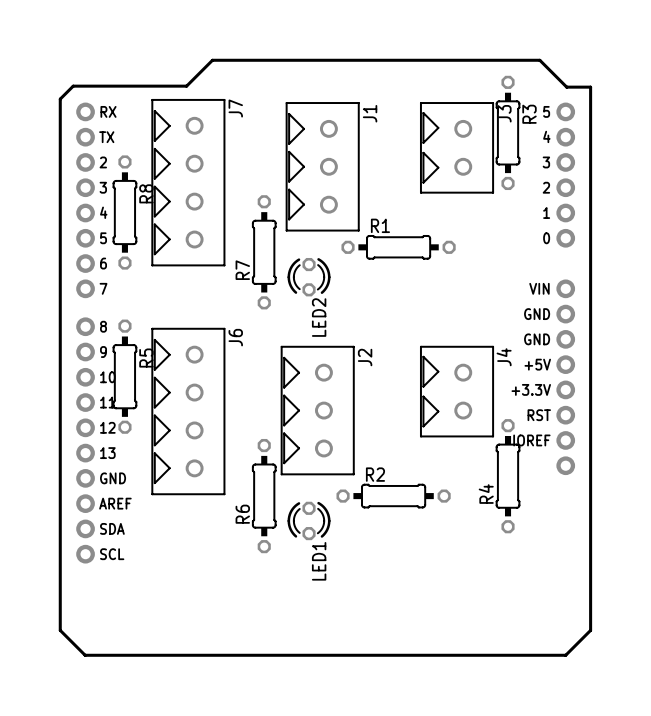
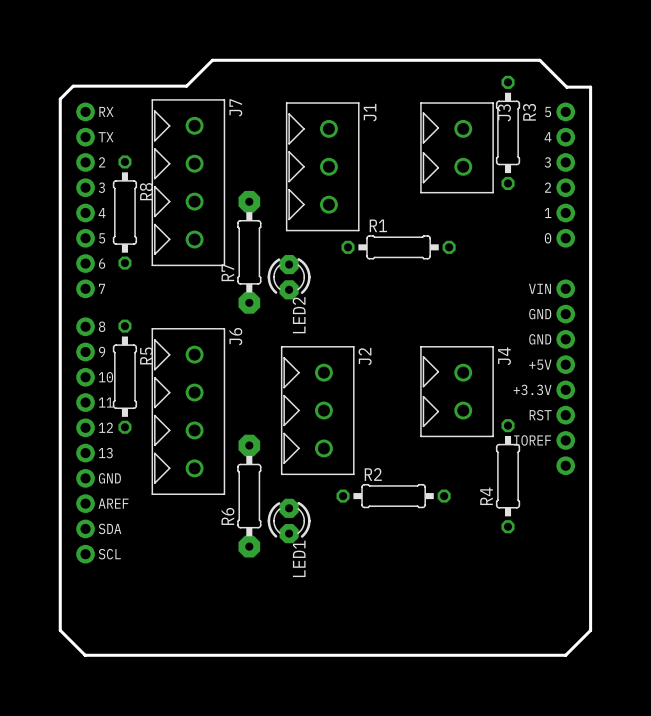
R7 footprint: [252, 195, 277, 310] -> [237, 190, 262, 314]
LED2 footprint: [287, 257, 331, 297] -> [267, 254, 311, 300]
R6 footprint: [252, 438, 277, 554] -> [237, 434, 262, 558]
LED1 footprint: [287, 501, 331, 541] -> [267, 498, 311, 544]

